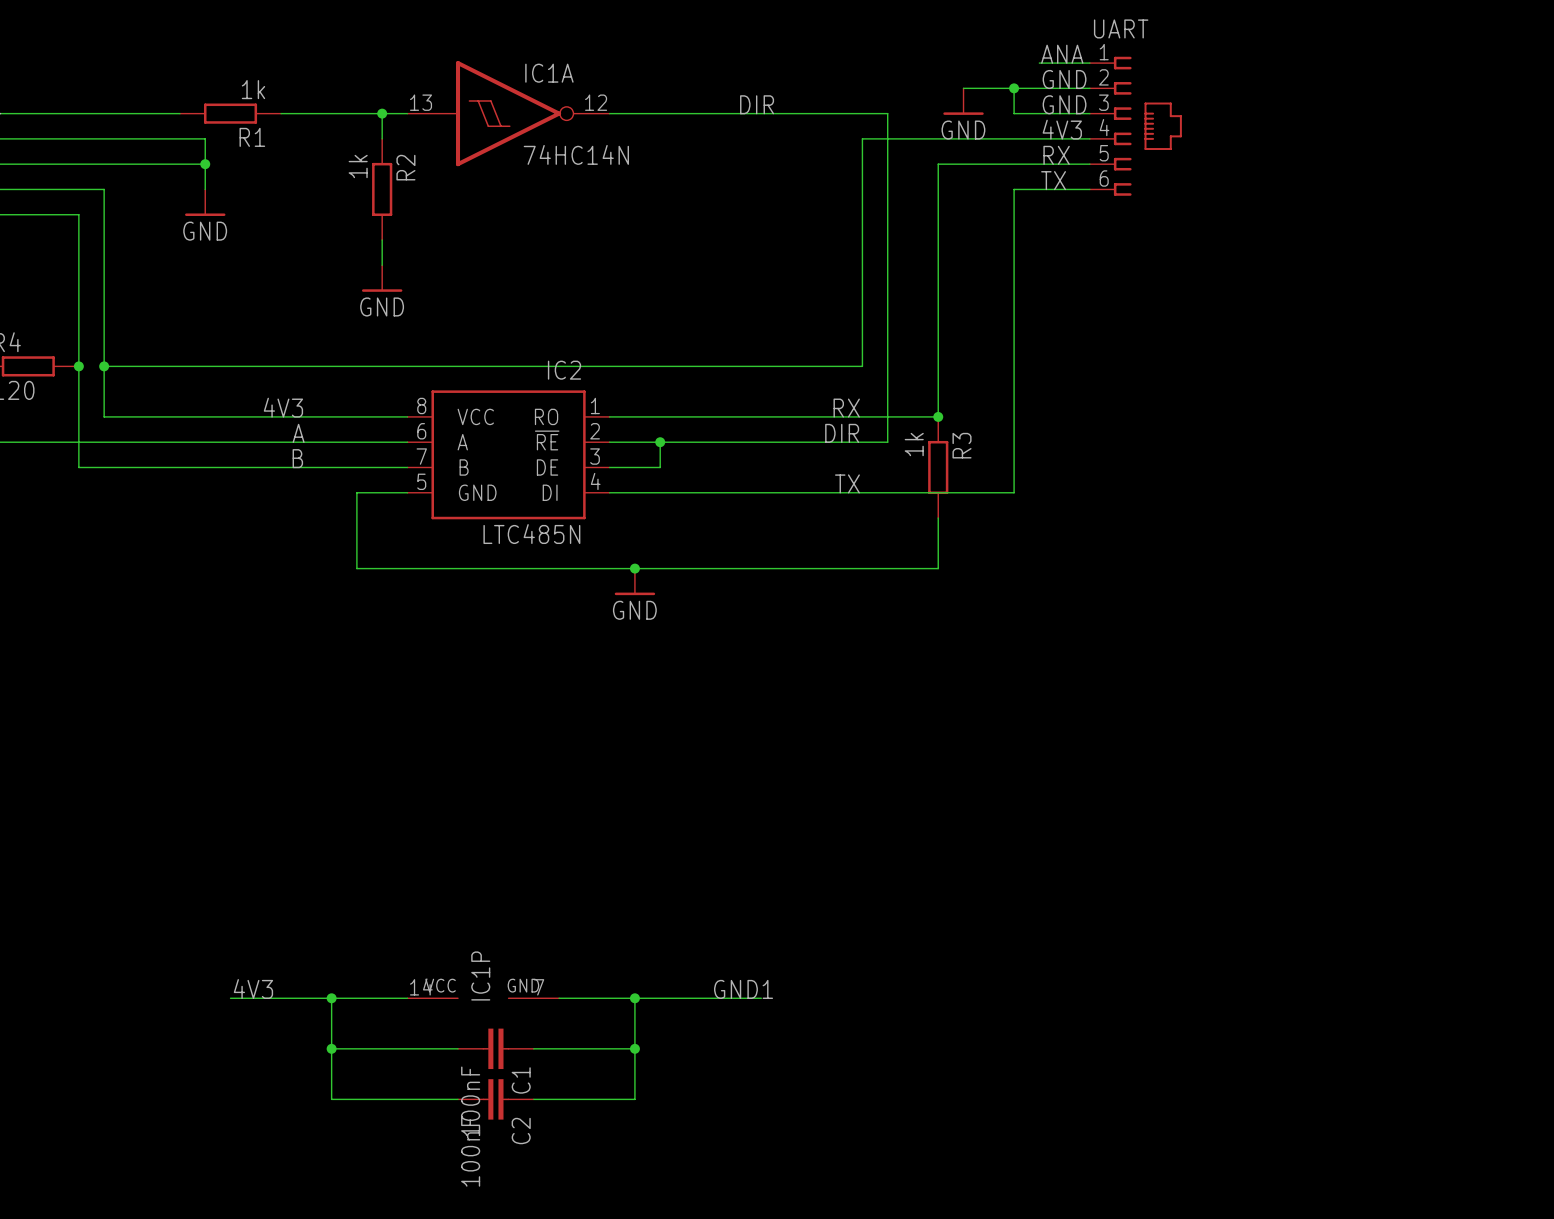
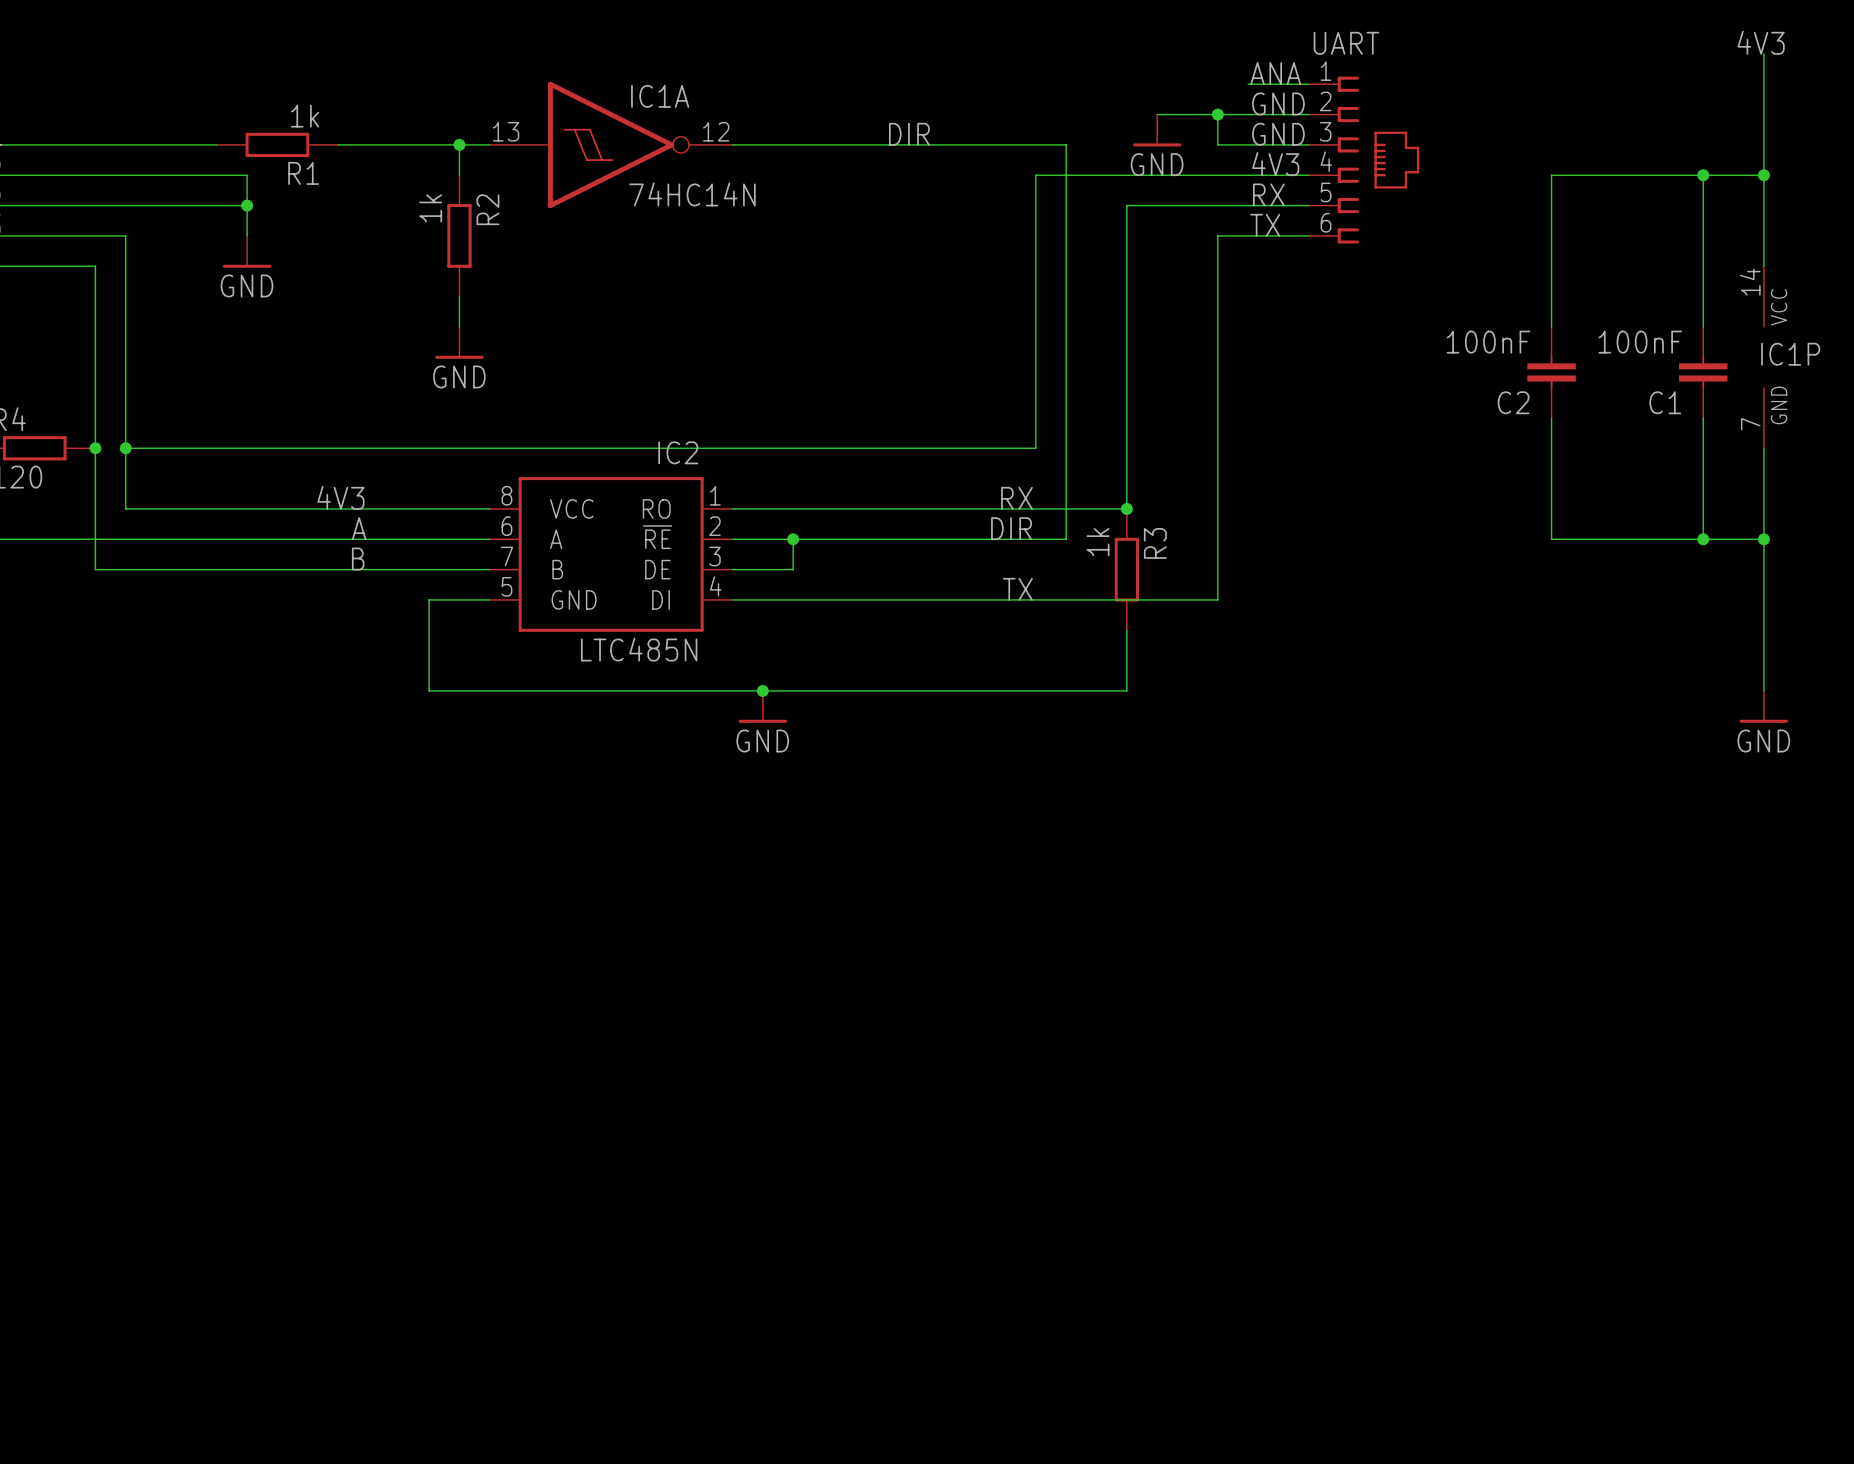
label: none -> 4V3 (1761, 42)
wire: none -> (1763, 53) (1763, 266)
wire: none -> (1703, 175) (1703, 326)
junction: none -> (1703, 175)
wire: none -> (1763, 175) (1551, 175) (1551, 326)
junction: none -> (1763, 175)
wire: none -> (1551, 417) (1551, 539) (1763, 539)
wire: none -> (1703, 417) (1703, 539)
wire: none -> (1763, 448) (1763, 690)
junction: none -> (1703, 539)
junction: none -> (1763, 539)
power symbol: none -> GND (1763, 706)
IC1P name position: IC1P (480, 975) -> IC1P (1790, 354)
label: 4V3 (253, 989) -> none
label: GND1 (743, 989) -> none
wire: (230, 998) (407, 998) -> none
wire: (331, 998) (331, 1099) (458, 1099) -> none
junction: (331, 998) -> none
IC1P symbol: [407, 998, 560, 999] -> [1763, 266, 1764, 449]
wire: (559, 998) (761, 998) -> none
wire: (634, 998) (634, 1099) (533, 1099) -> none
junction: (634, 998) -> none
wire: (331, 1048) (458, 1048) -> none
junction: (331, 1048) -> none
C1 rotation: 0° (495, 1048) -> 90° clockwise (1703, 372)
C1 position: (495, 1048) -> (1703, 372)
wire: (533, 1048) (634, 1048) -> none
junction: (634, 1048) -> none
C2 rotation: 0° (495, 1099) -> 90° clockwise (1551, 372)
C2 position: (495, 1099) -> (1551, 372)

